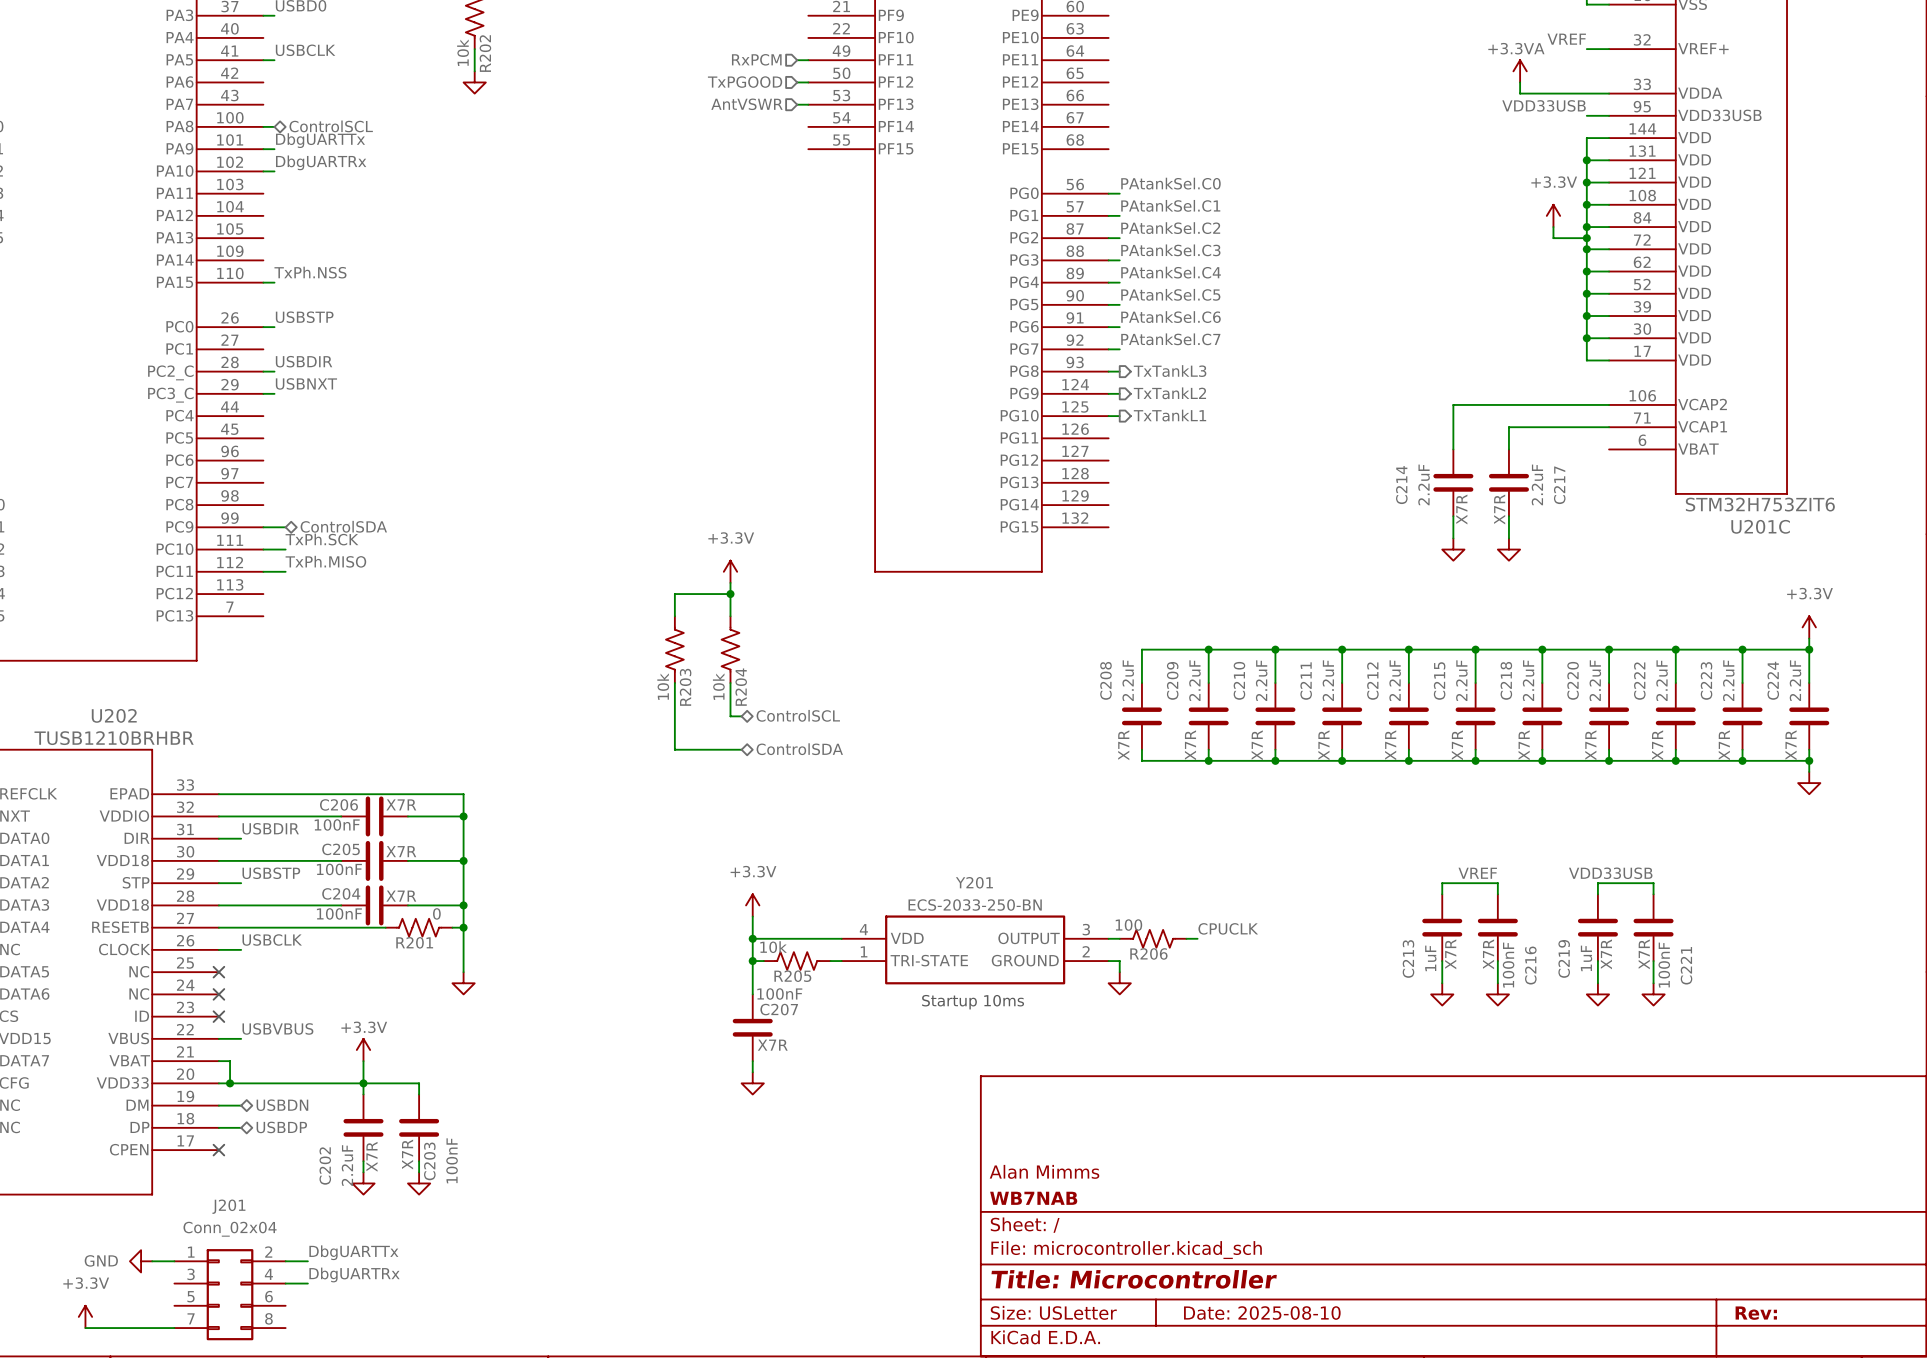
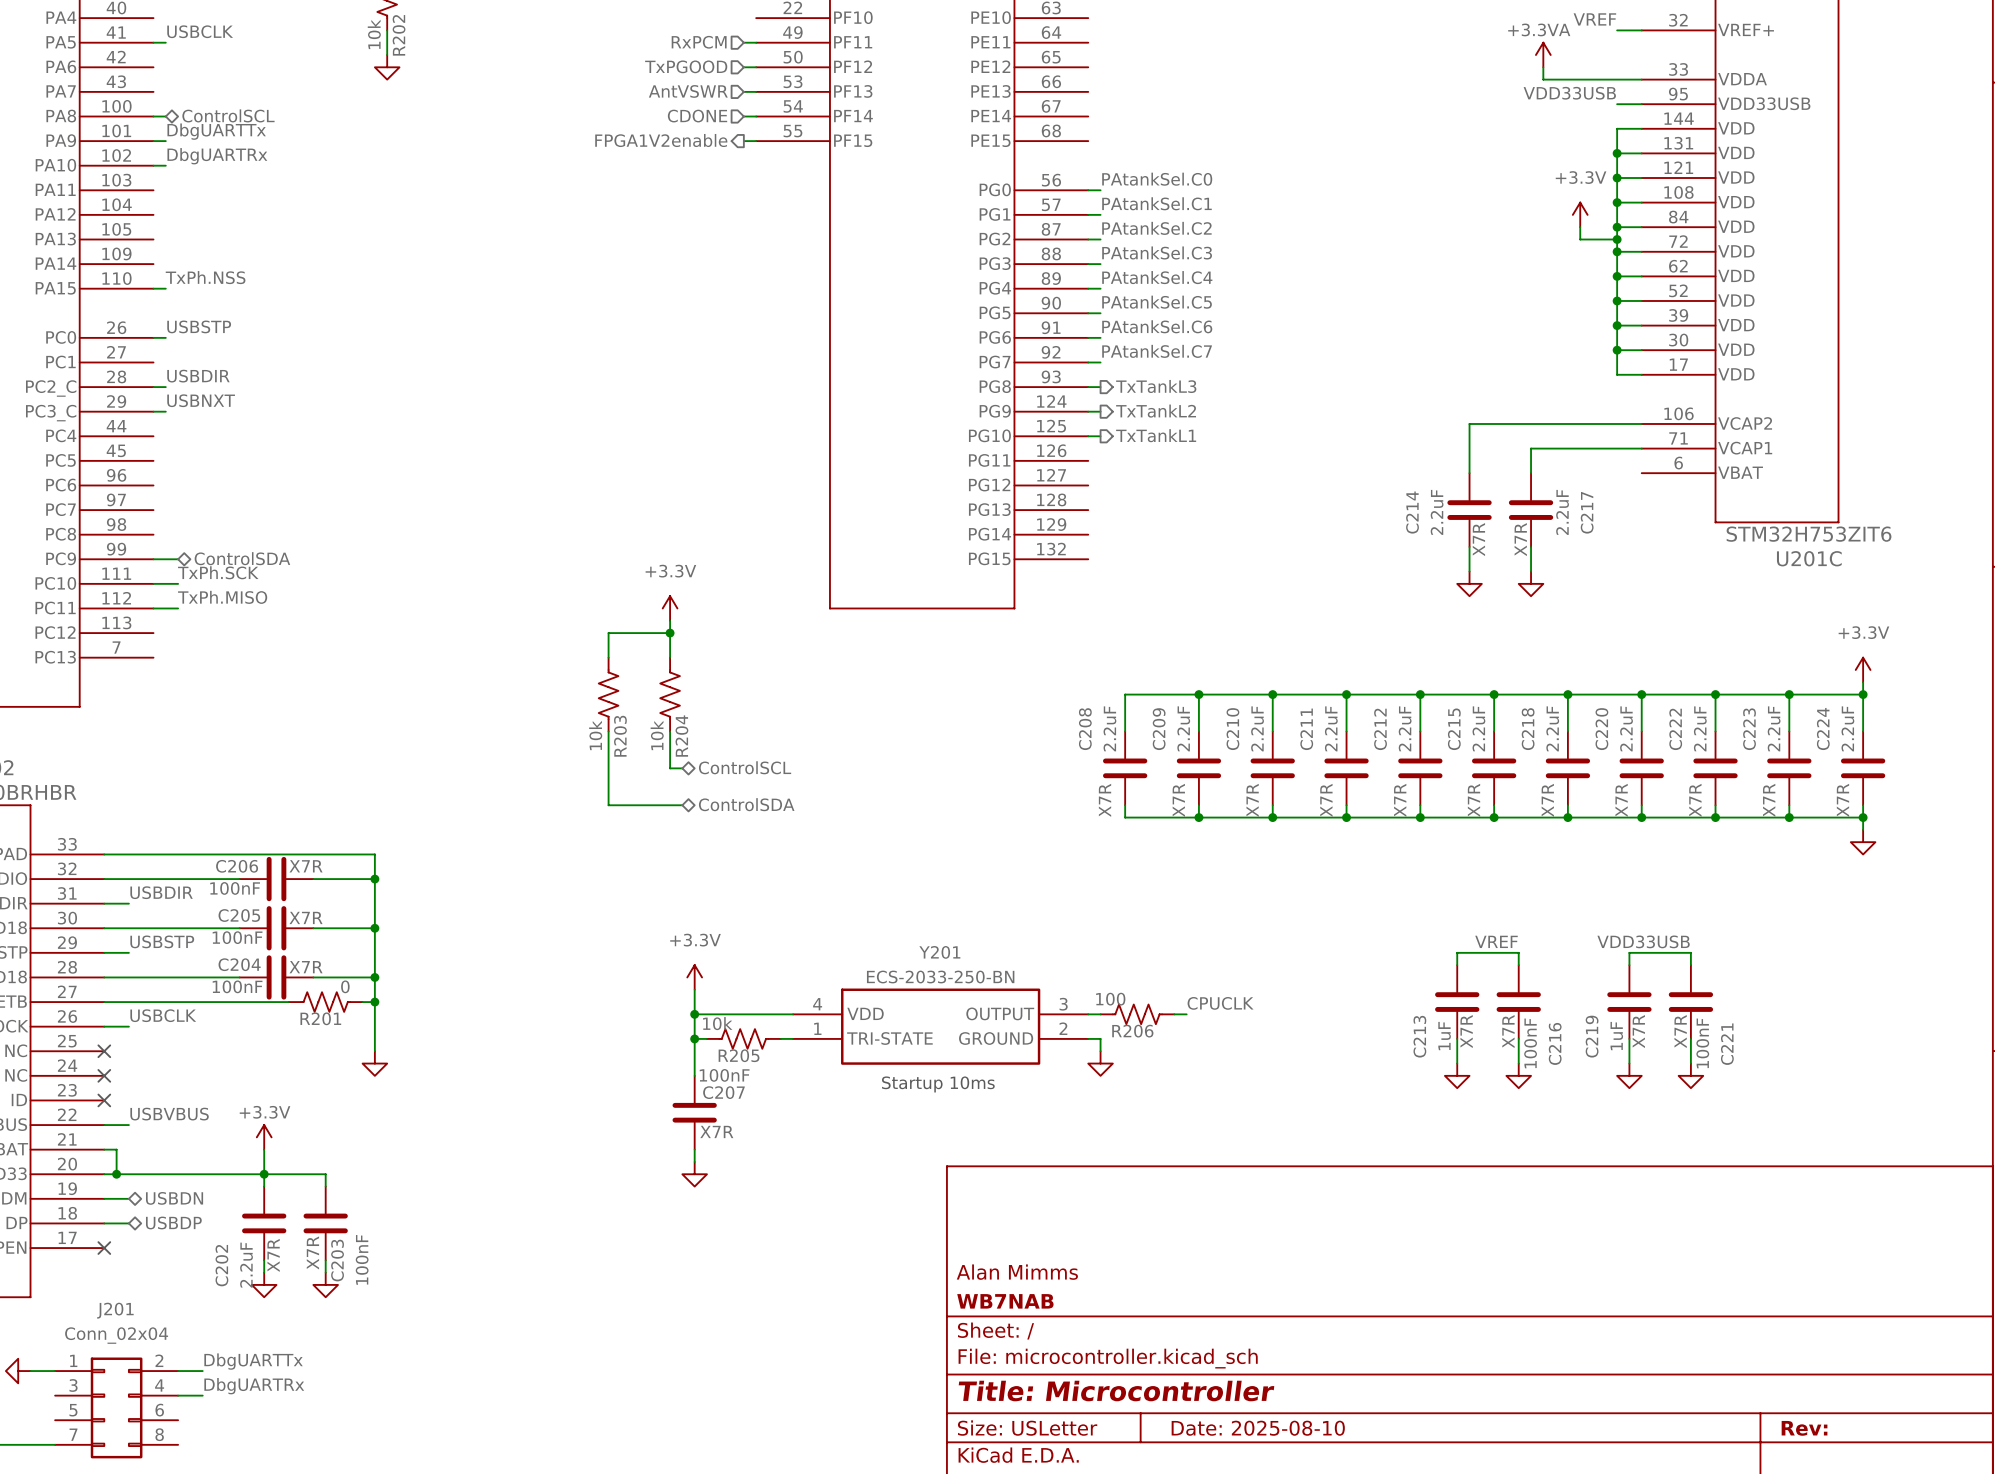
hierarchical label: none -> CDONE (697, 116)
wire: none -> (743, 116) (756, 116)
hierarchical label: none -> FPGA1V2enable (661, 140)
wire: none -> (743, 141) (756, 141)

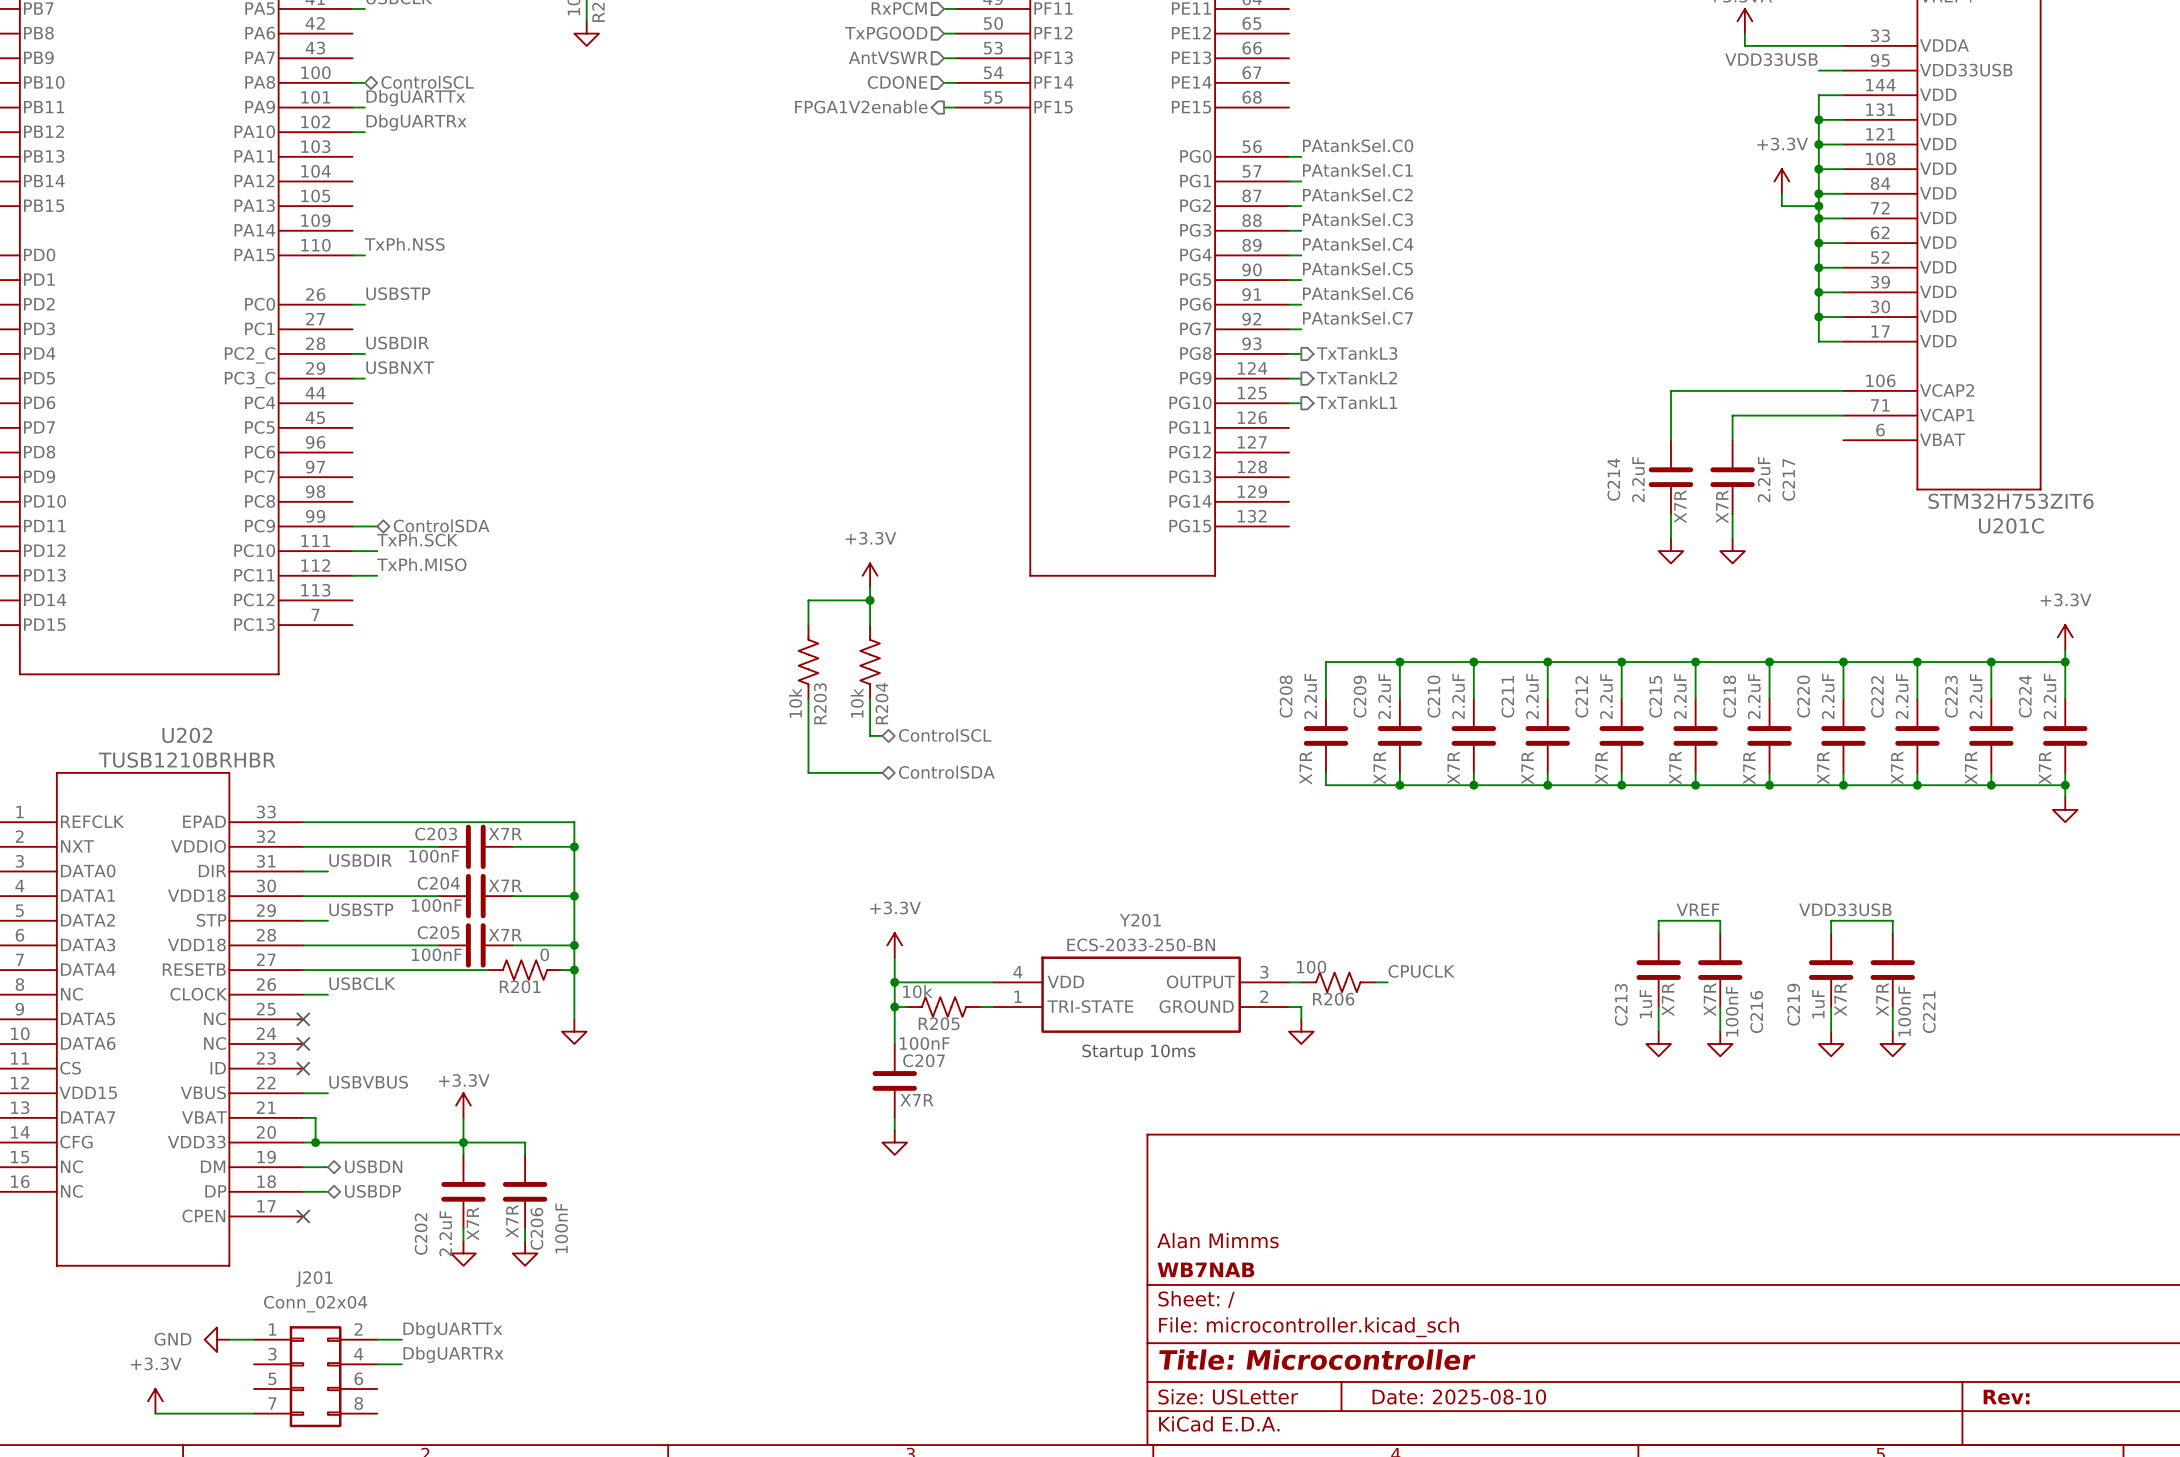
C206 name: C206 (237, 866) -> C203 (436, 834)
C205 name: C205 (239, 915) -> C204 (438, 883)
C204 name: C204 (239, 964) -> C205 (438, 932)
C203 name: C203 (337, 1260) -> C206 (536, 1228)

